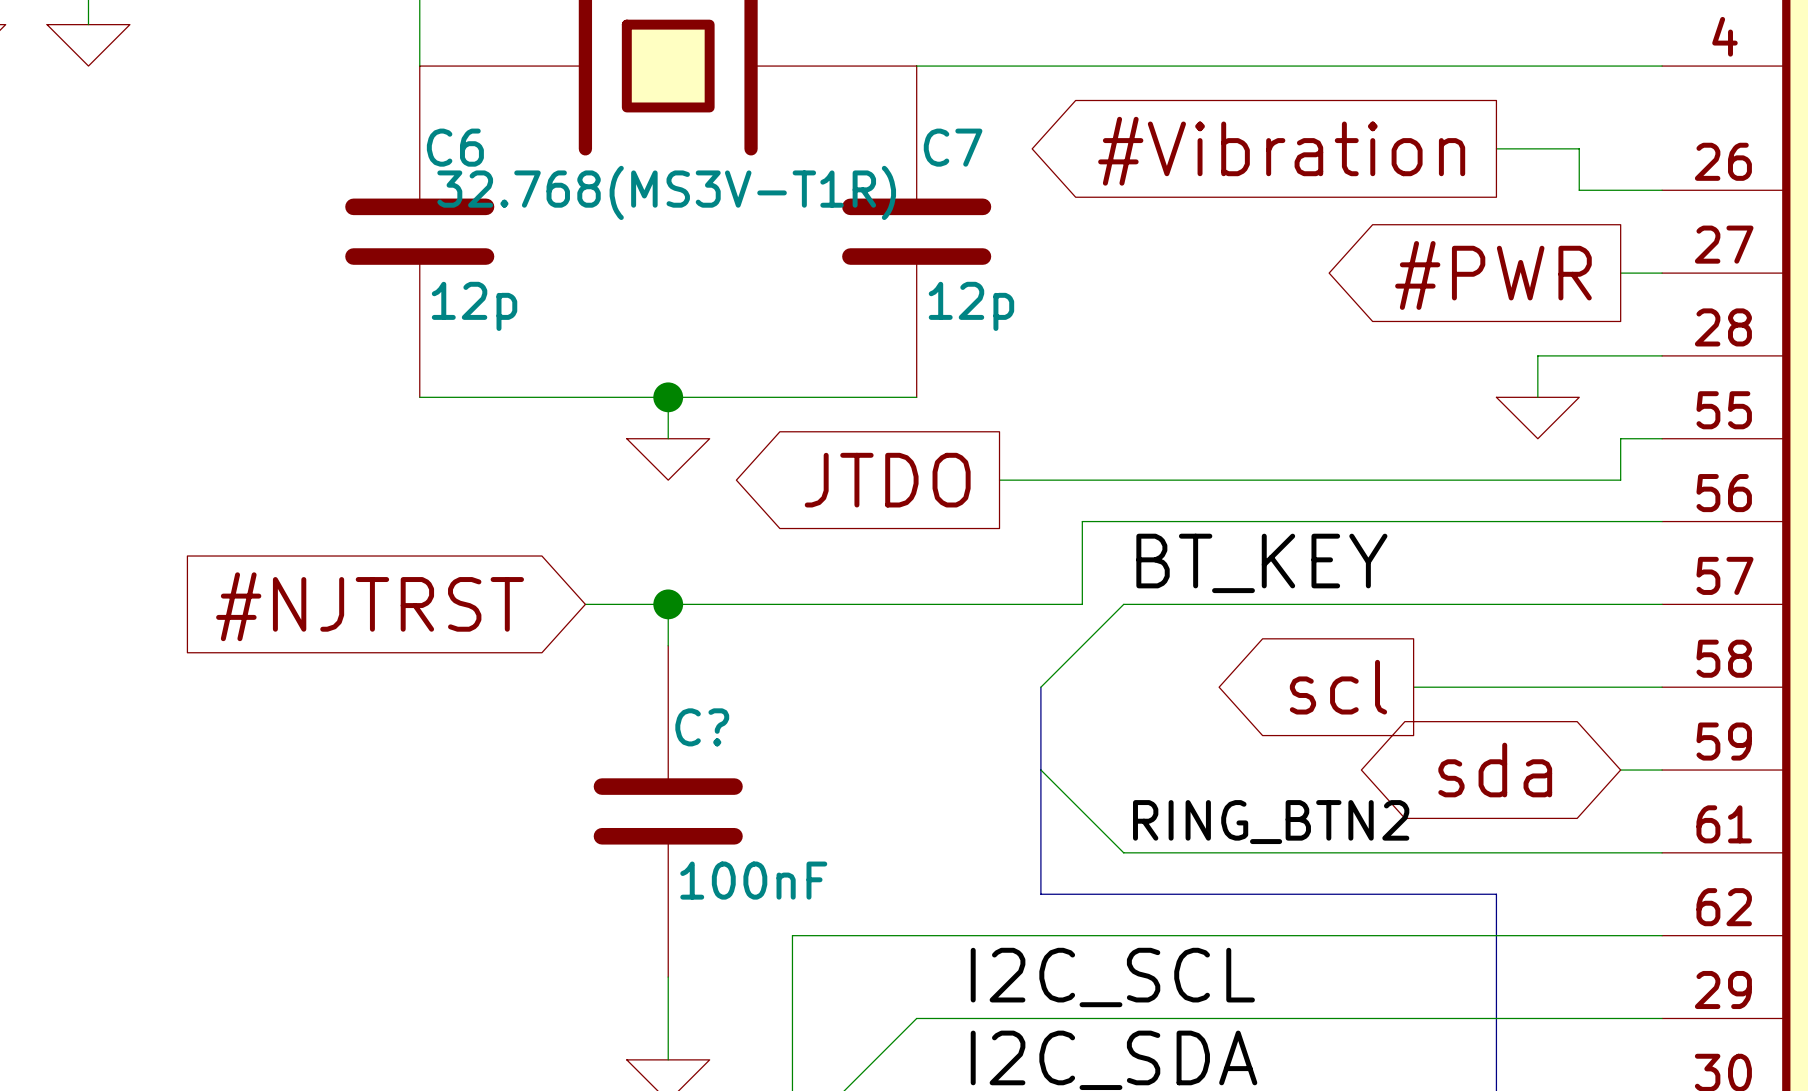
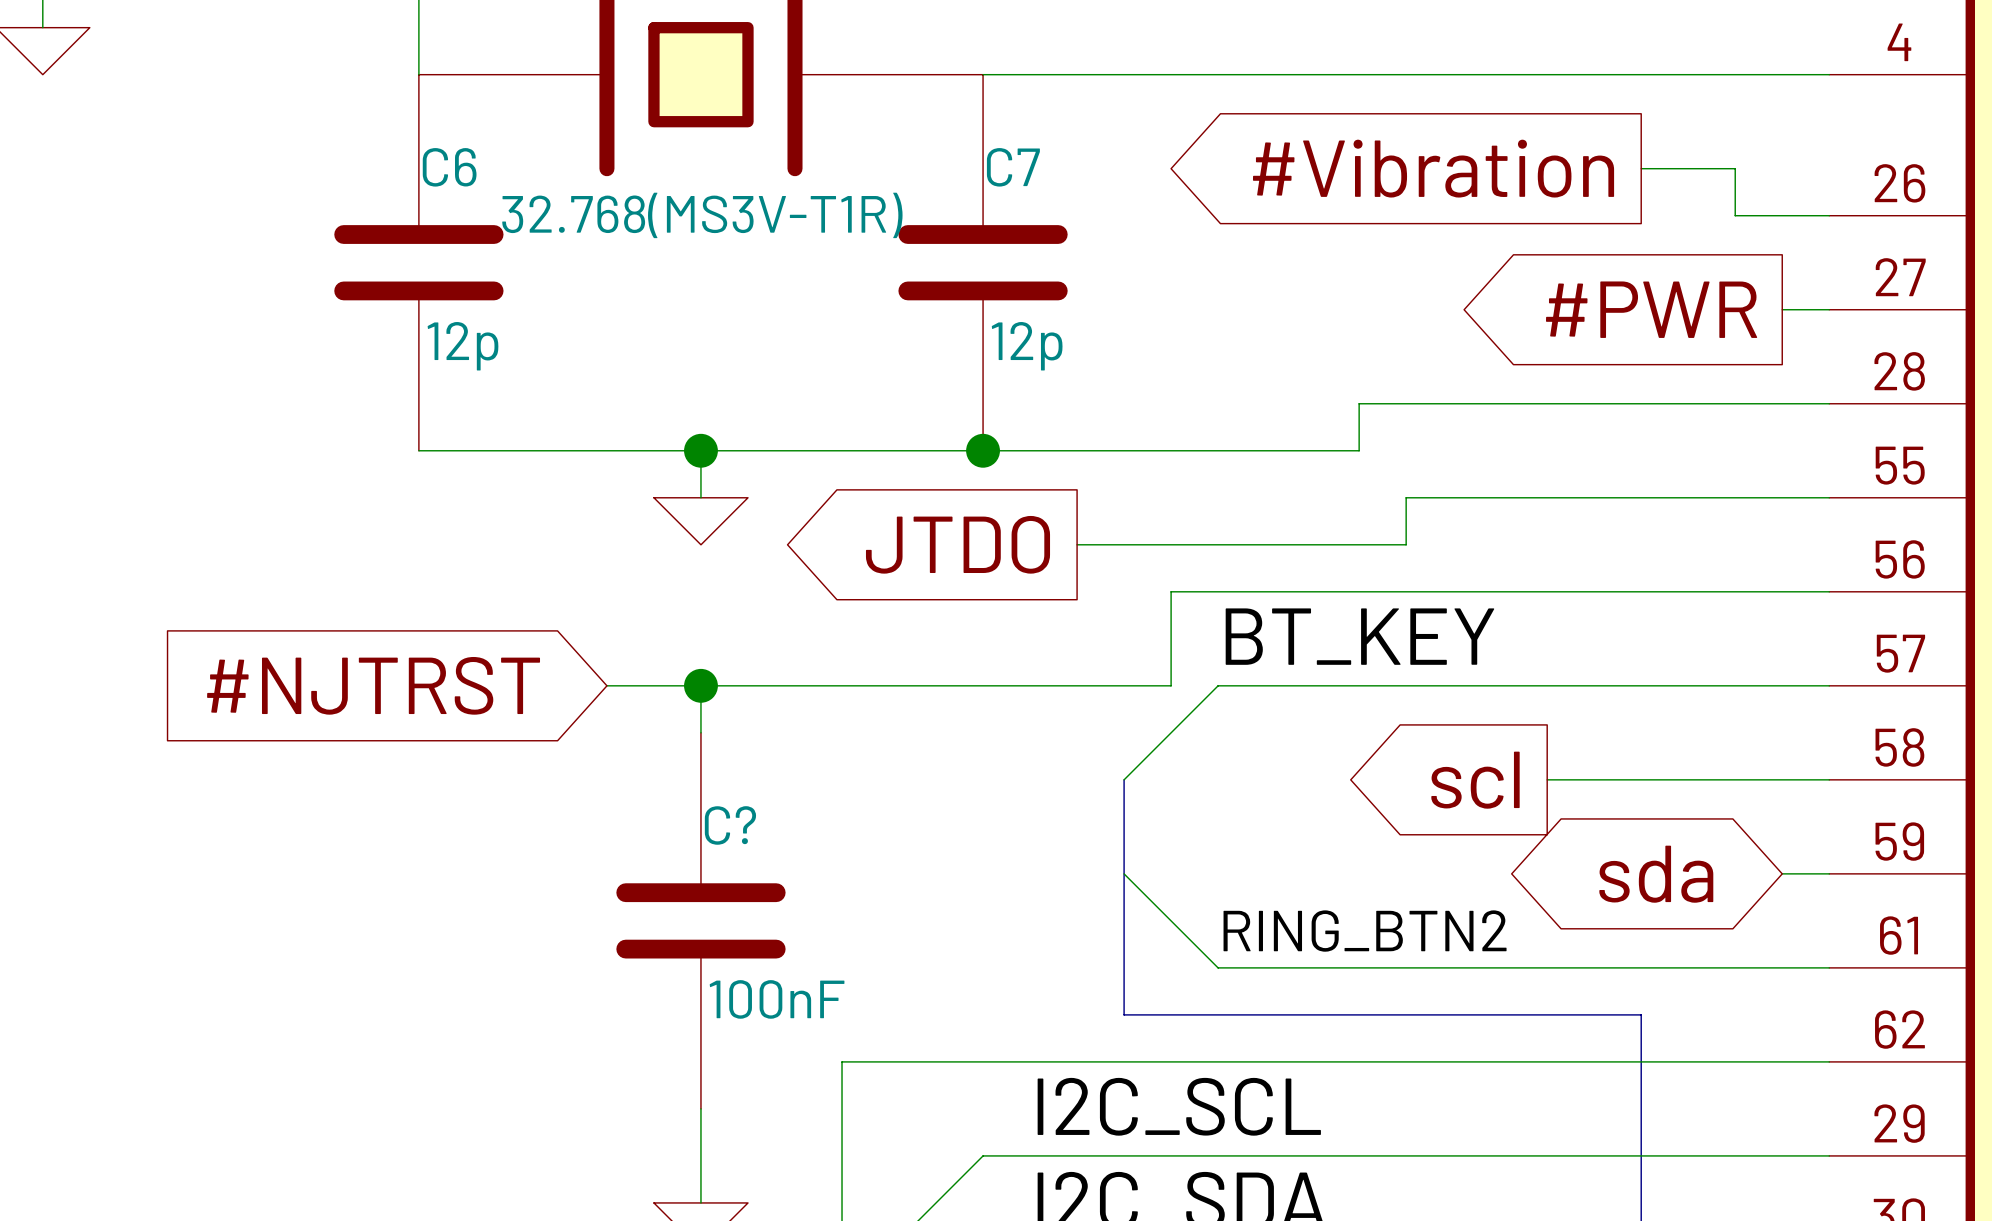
wire: (1537, 355) (1537, 397) -> (1688, 403) (1359, 403) (1359, 450) (983, 450)
junction: none -> (983, 450)
power symbol: (1537, 418) -> none
wire: (1620, 438) (1620, 480) (1289, 480) -> (1782, 497) (1406, 497) (1406, 544)

